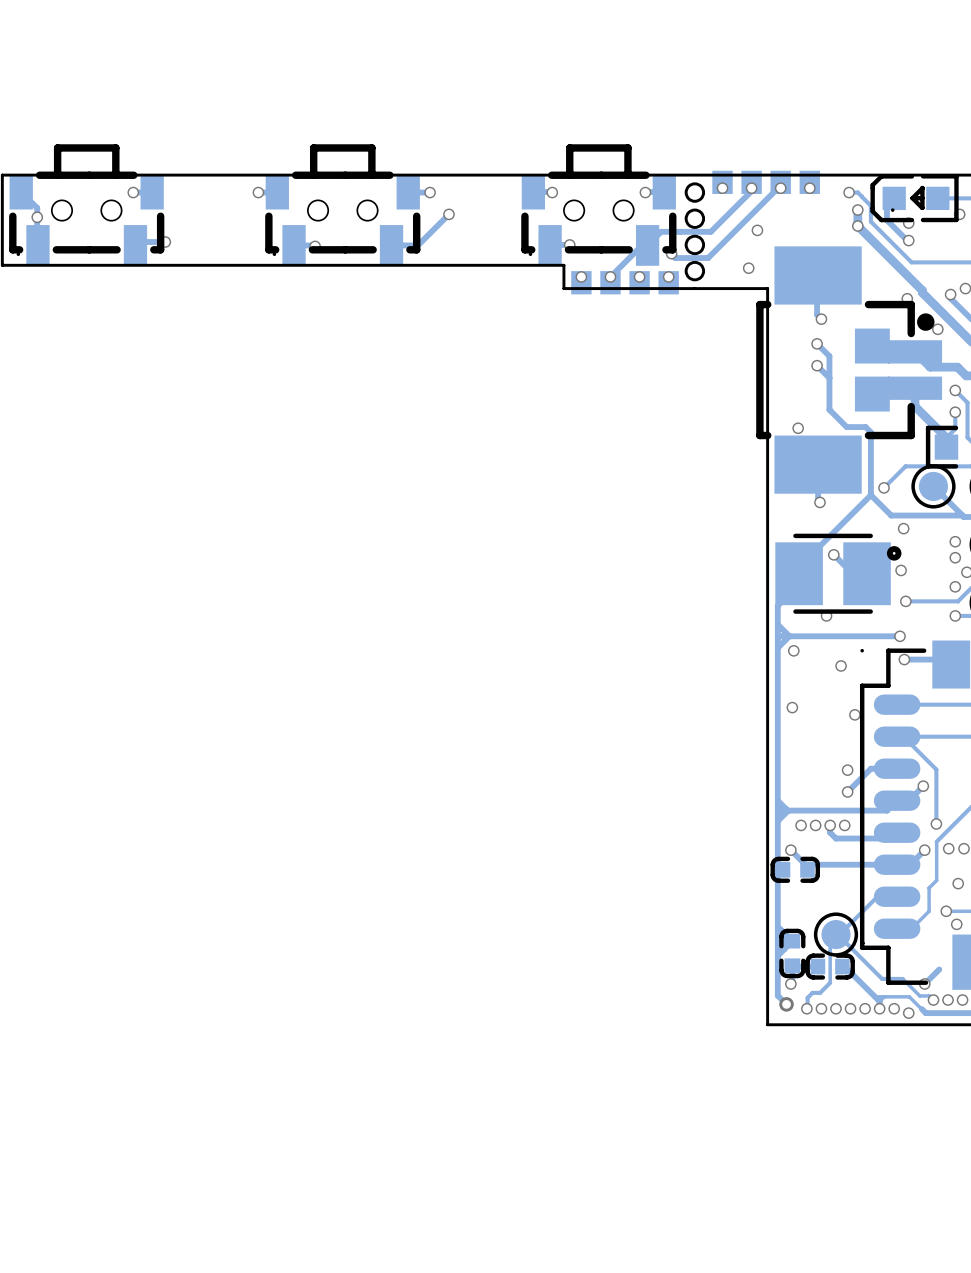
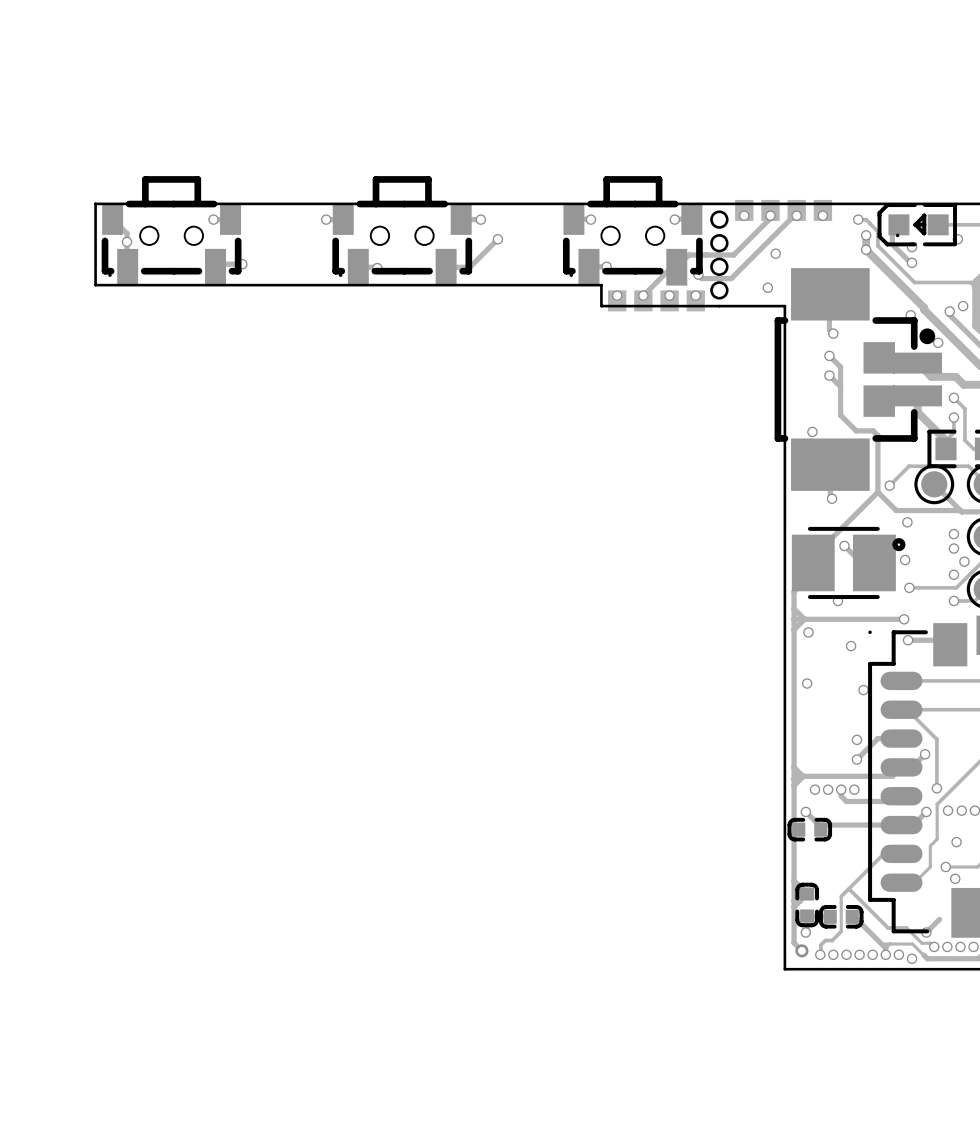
part: (835, 934) -> none

